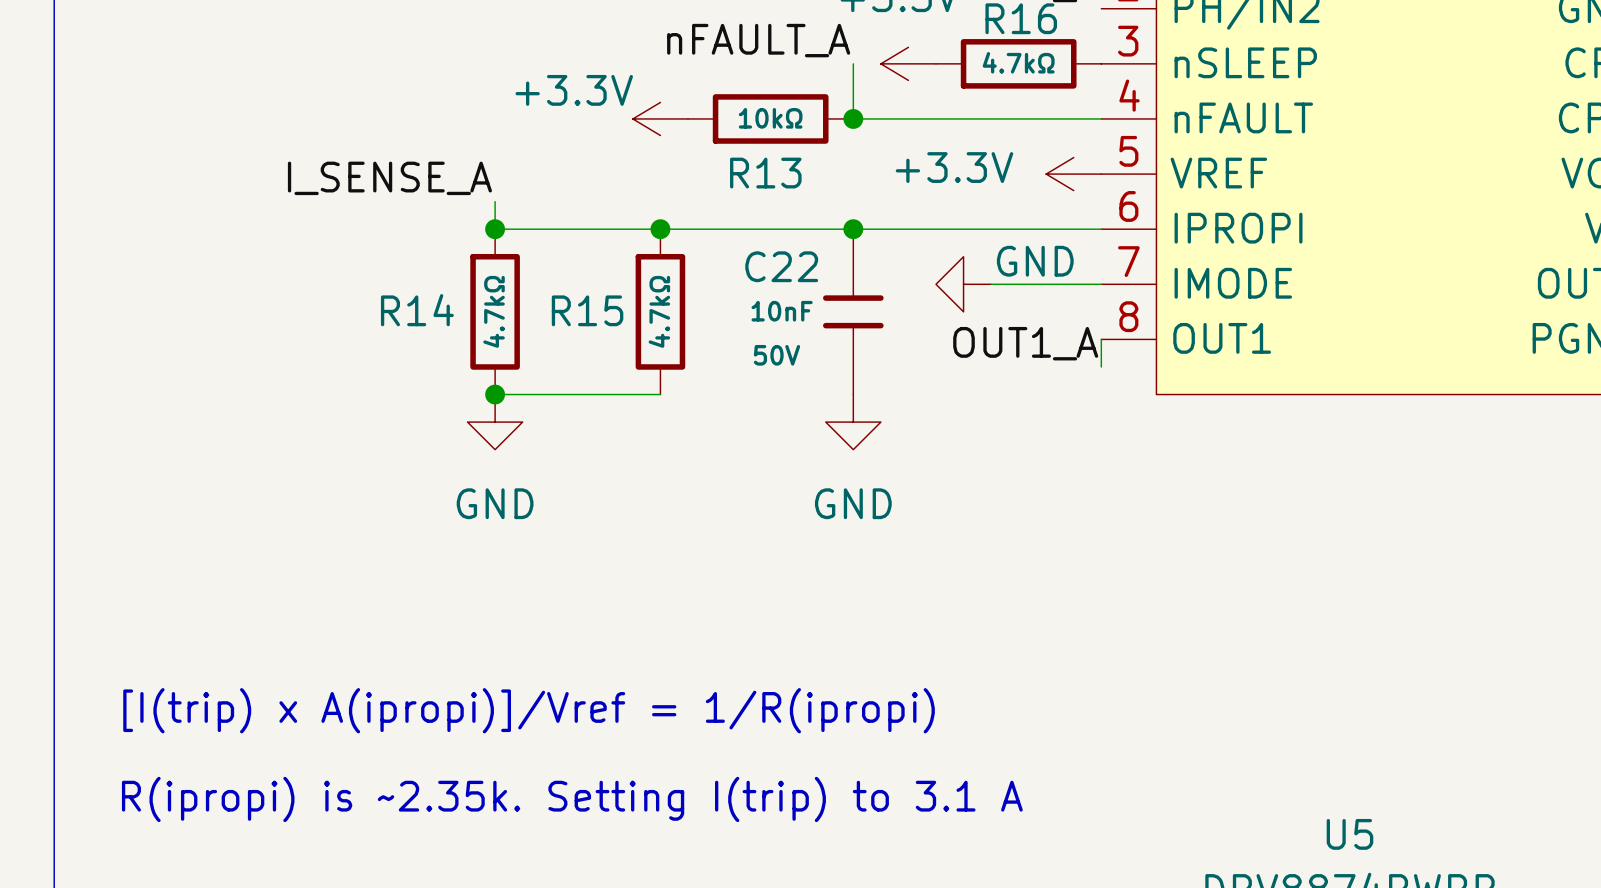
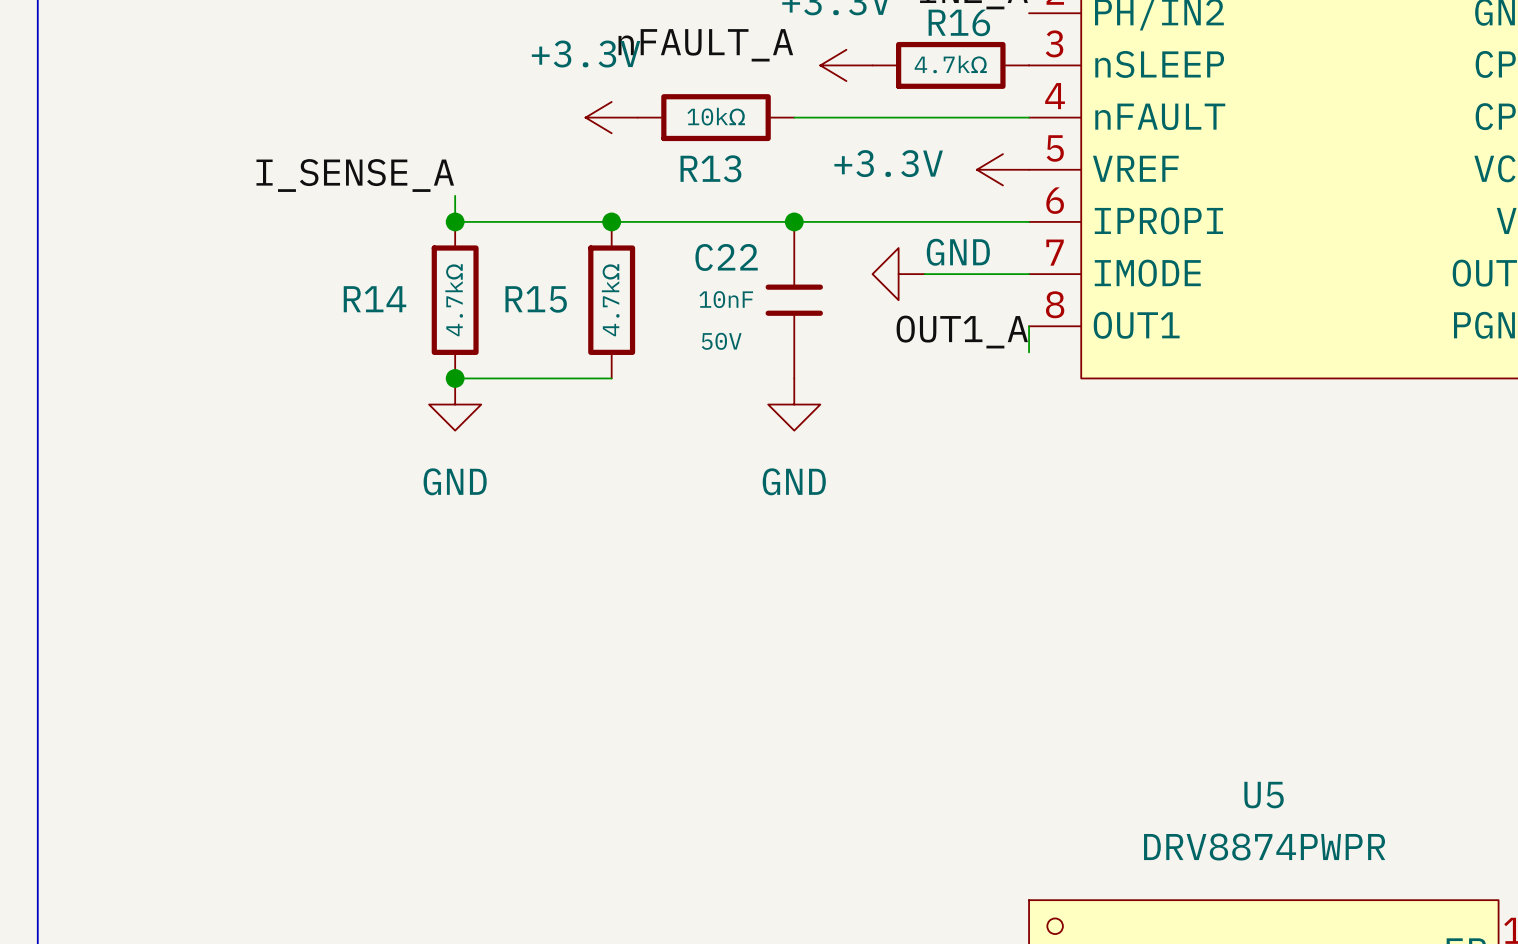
wire: (853, 63) (853, 118) -> none
power symbol text position: +3.3V (574, 90) -> +3.3V (586, 54)
junction: (853, 118) -> none
text: [I(trip) x A(ipropi)]/Vref = 1/R(ipropi) (529, 710) -> none
text: R(ipropi) is ~2.35k. Setting I(trip) to 3.1 A (572, 799) -> none

